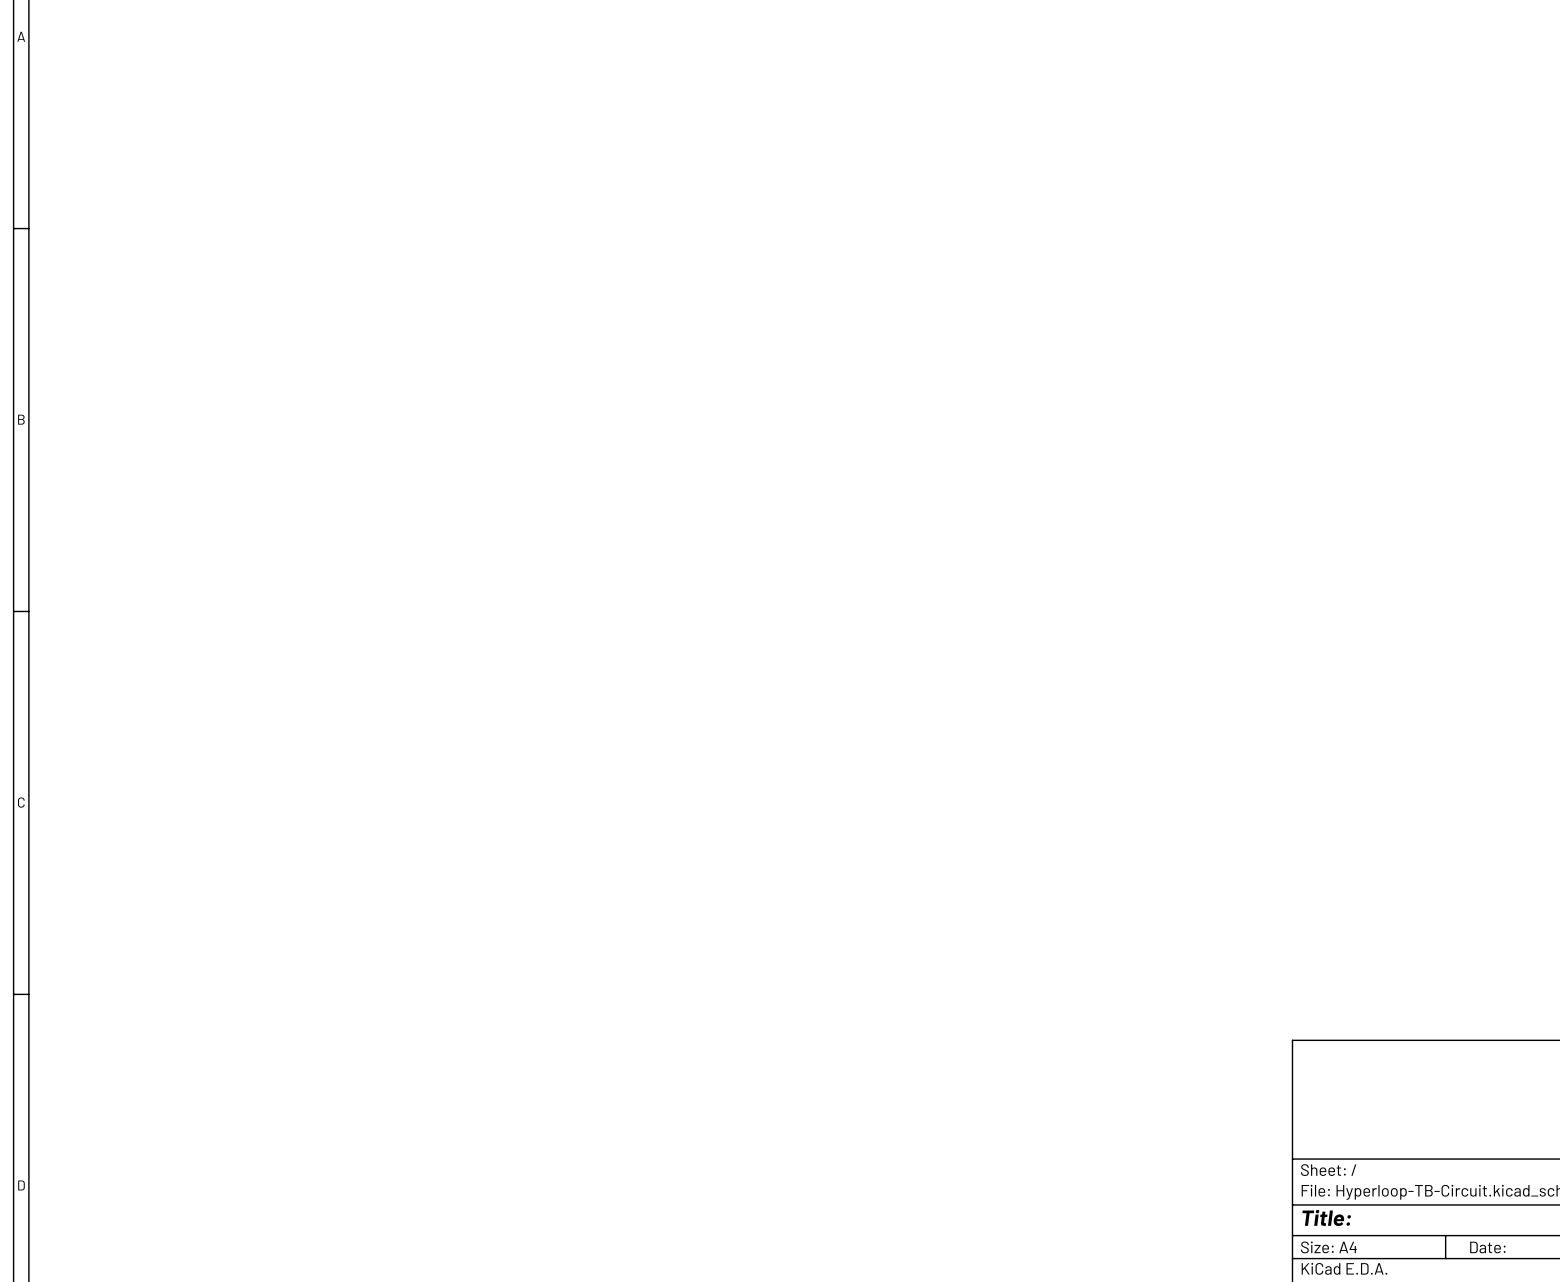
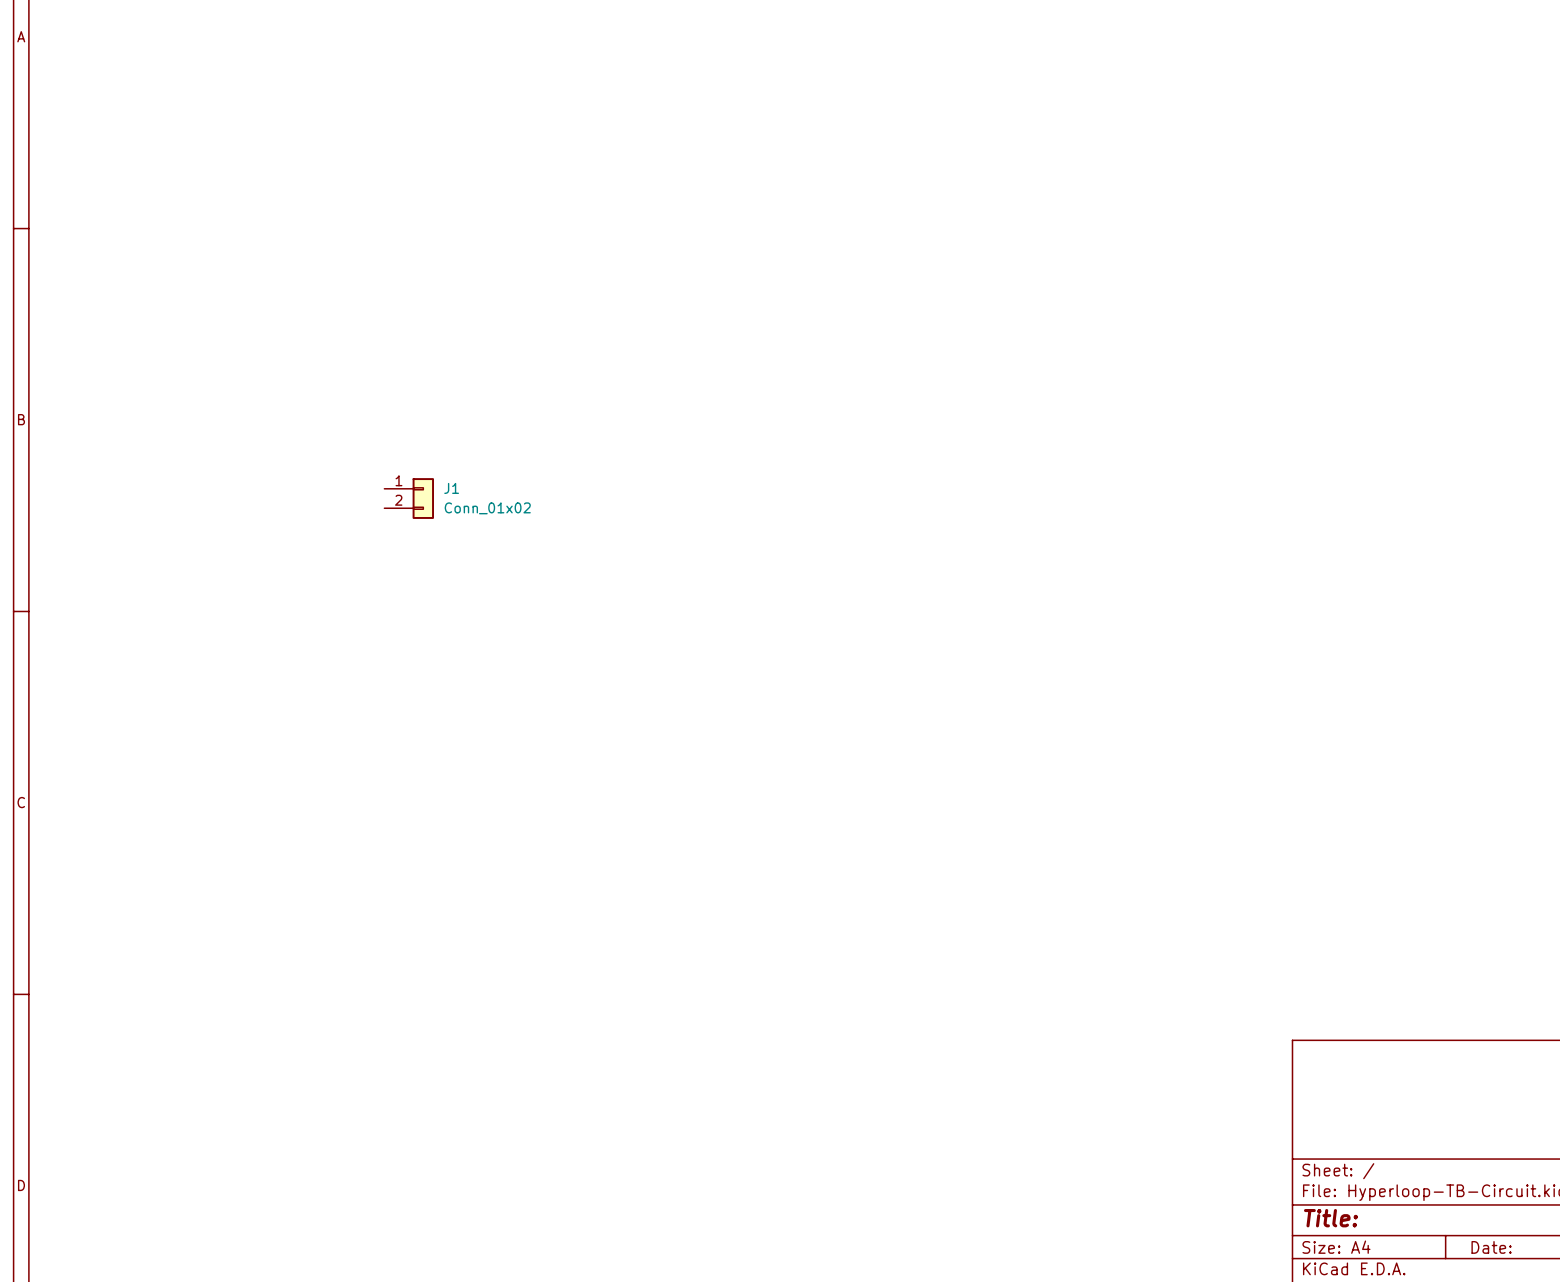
J1: none -> Conn_01x02 (409, 498)

